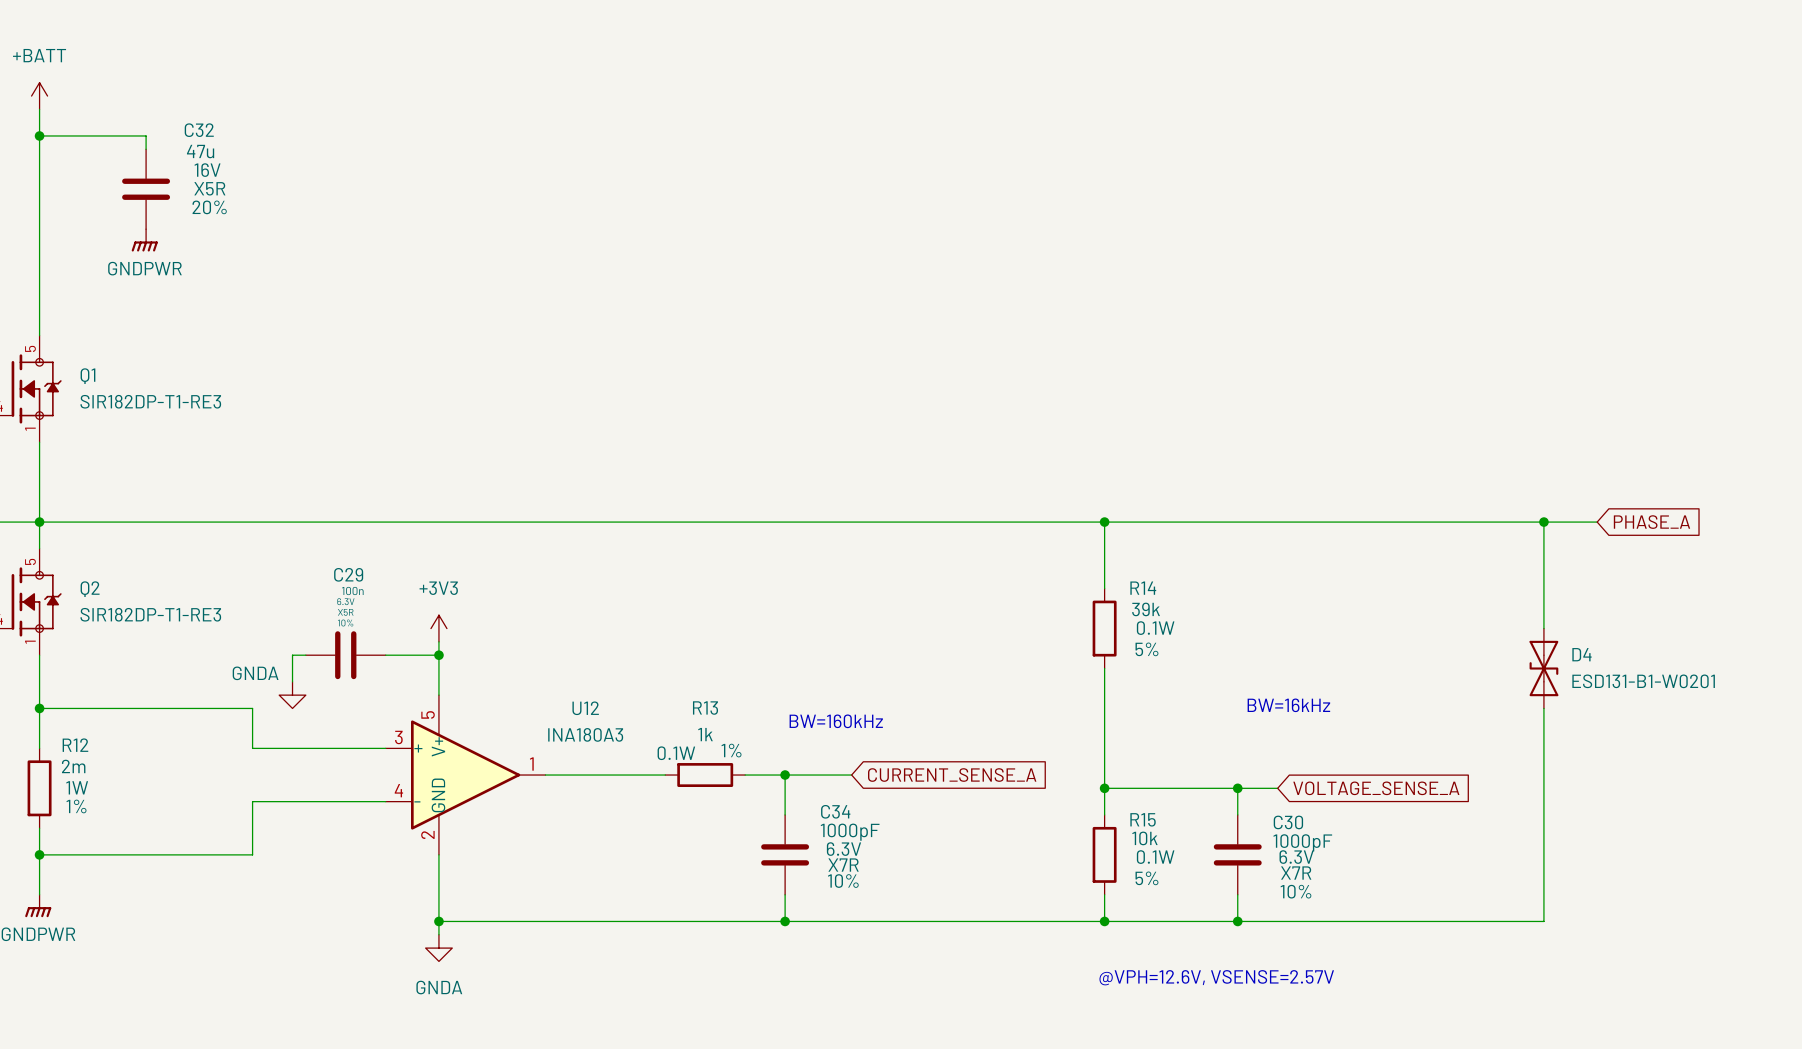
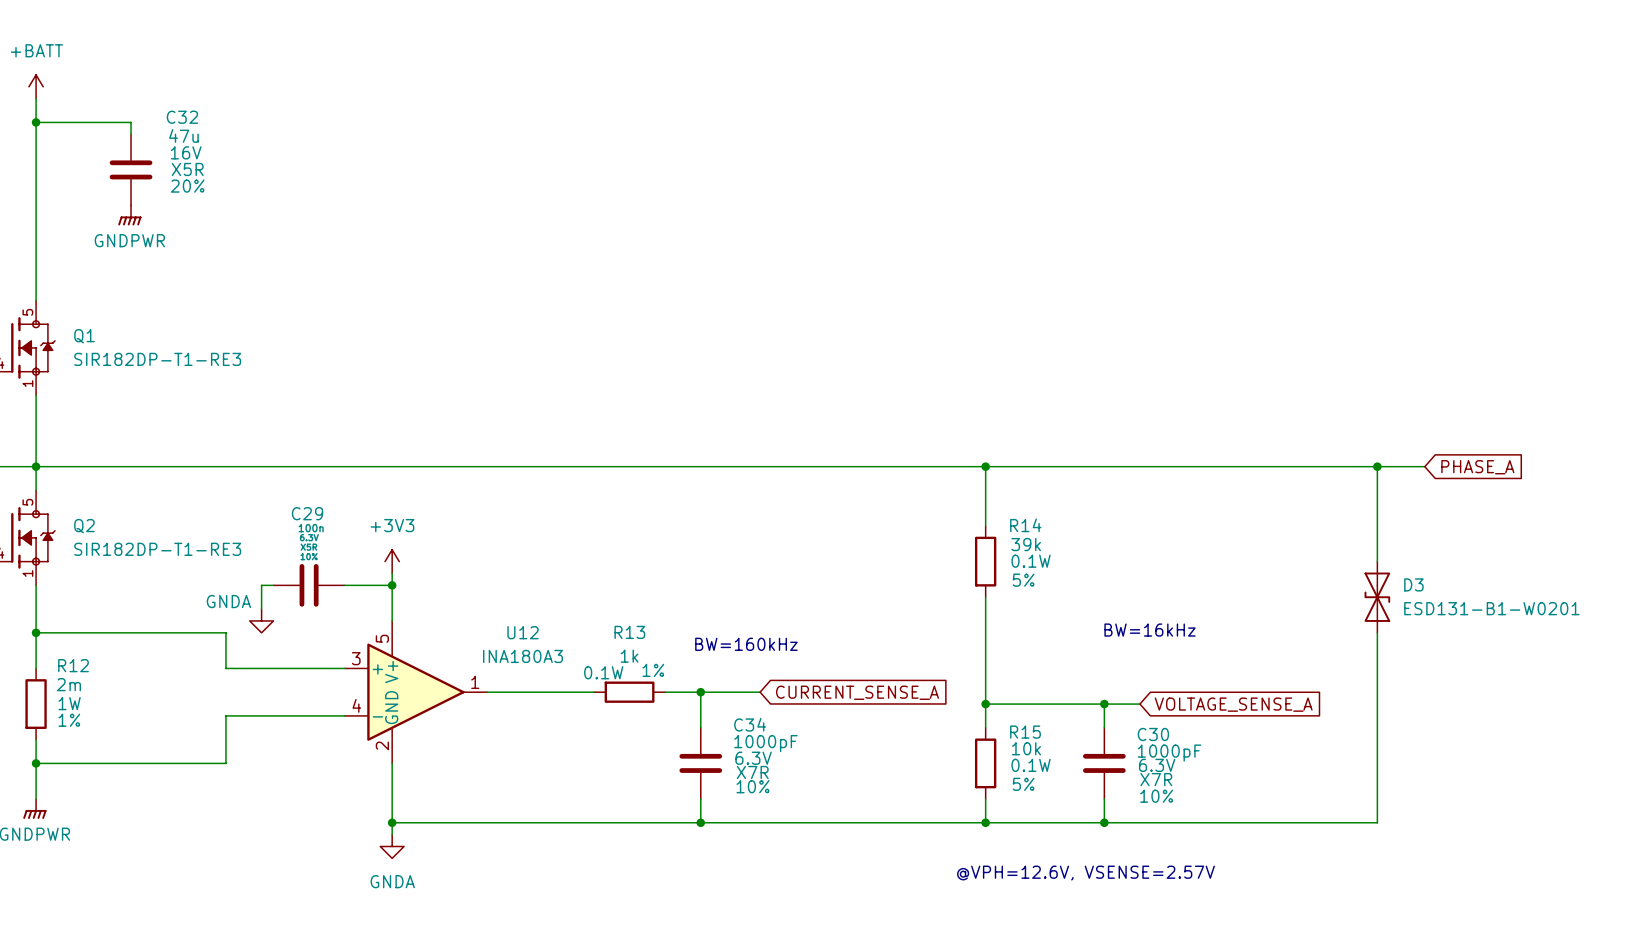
D4 name: D4 (1582, 654) -> D3 (1413, 584)

